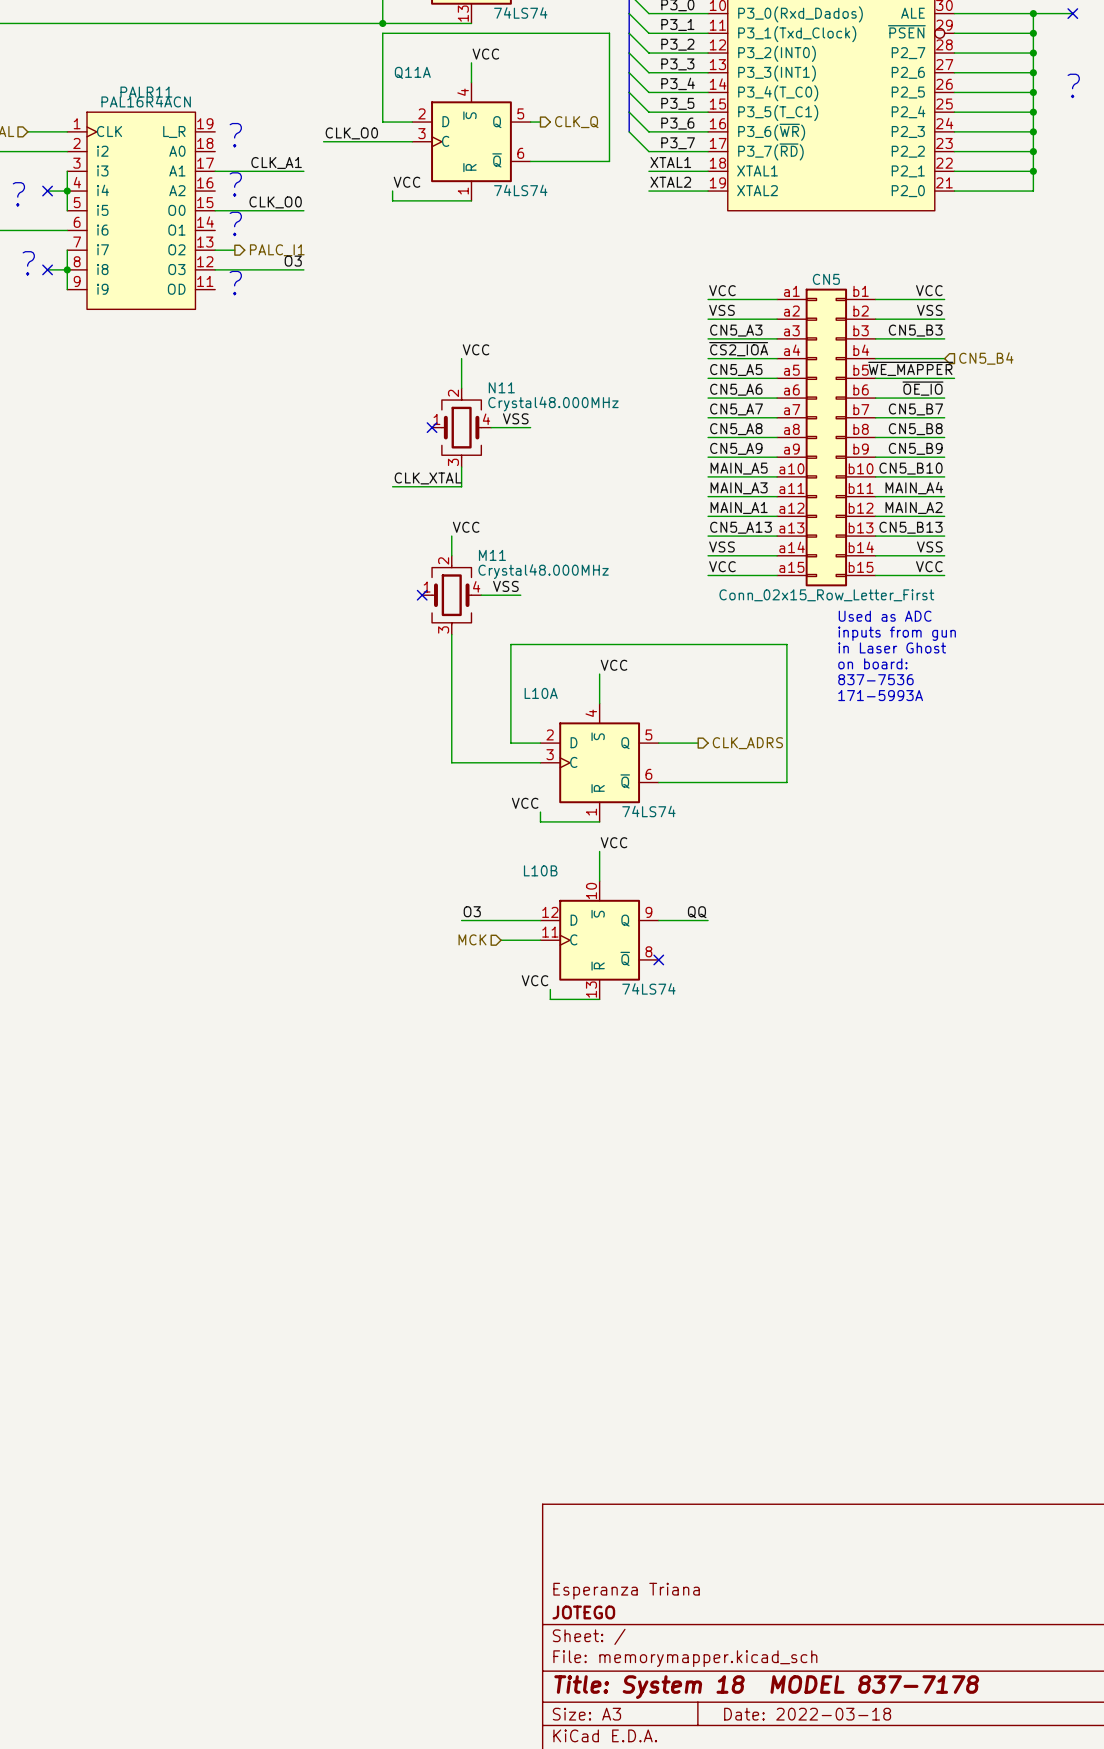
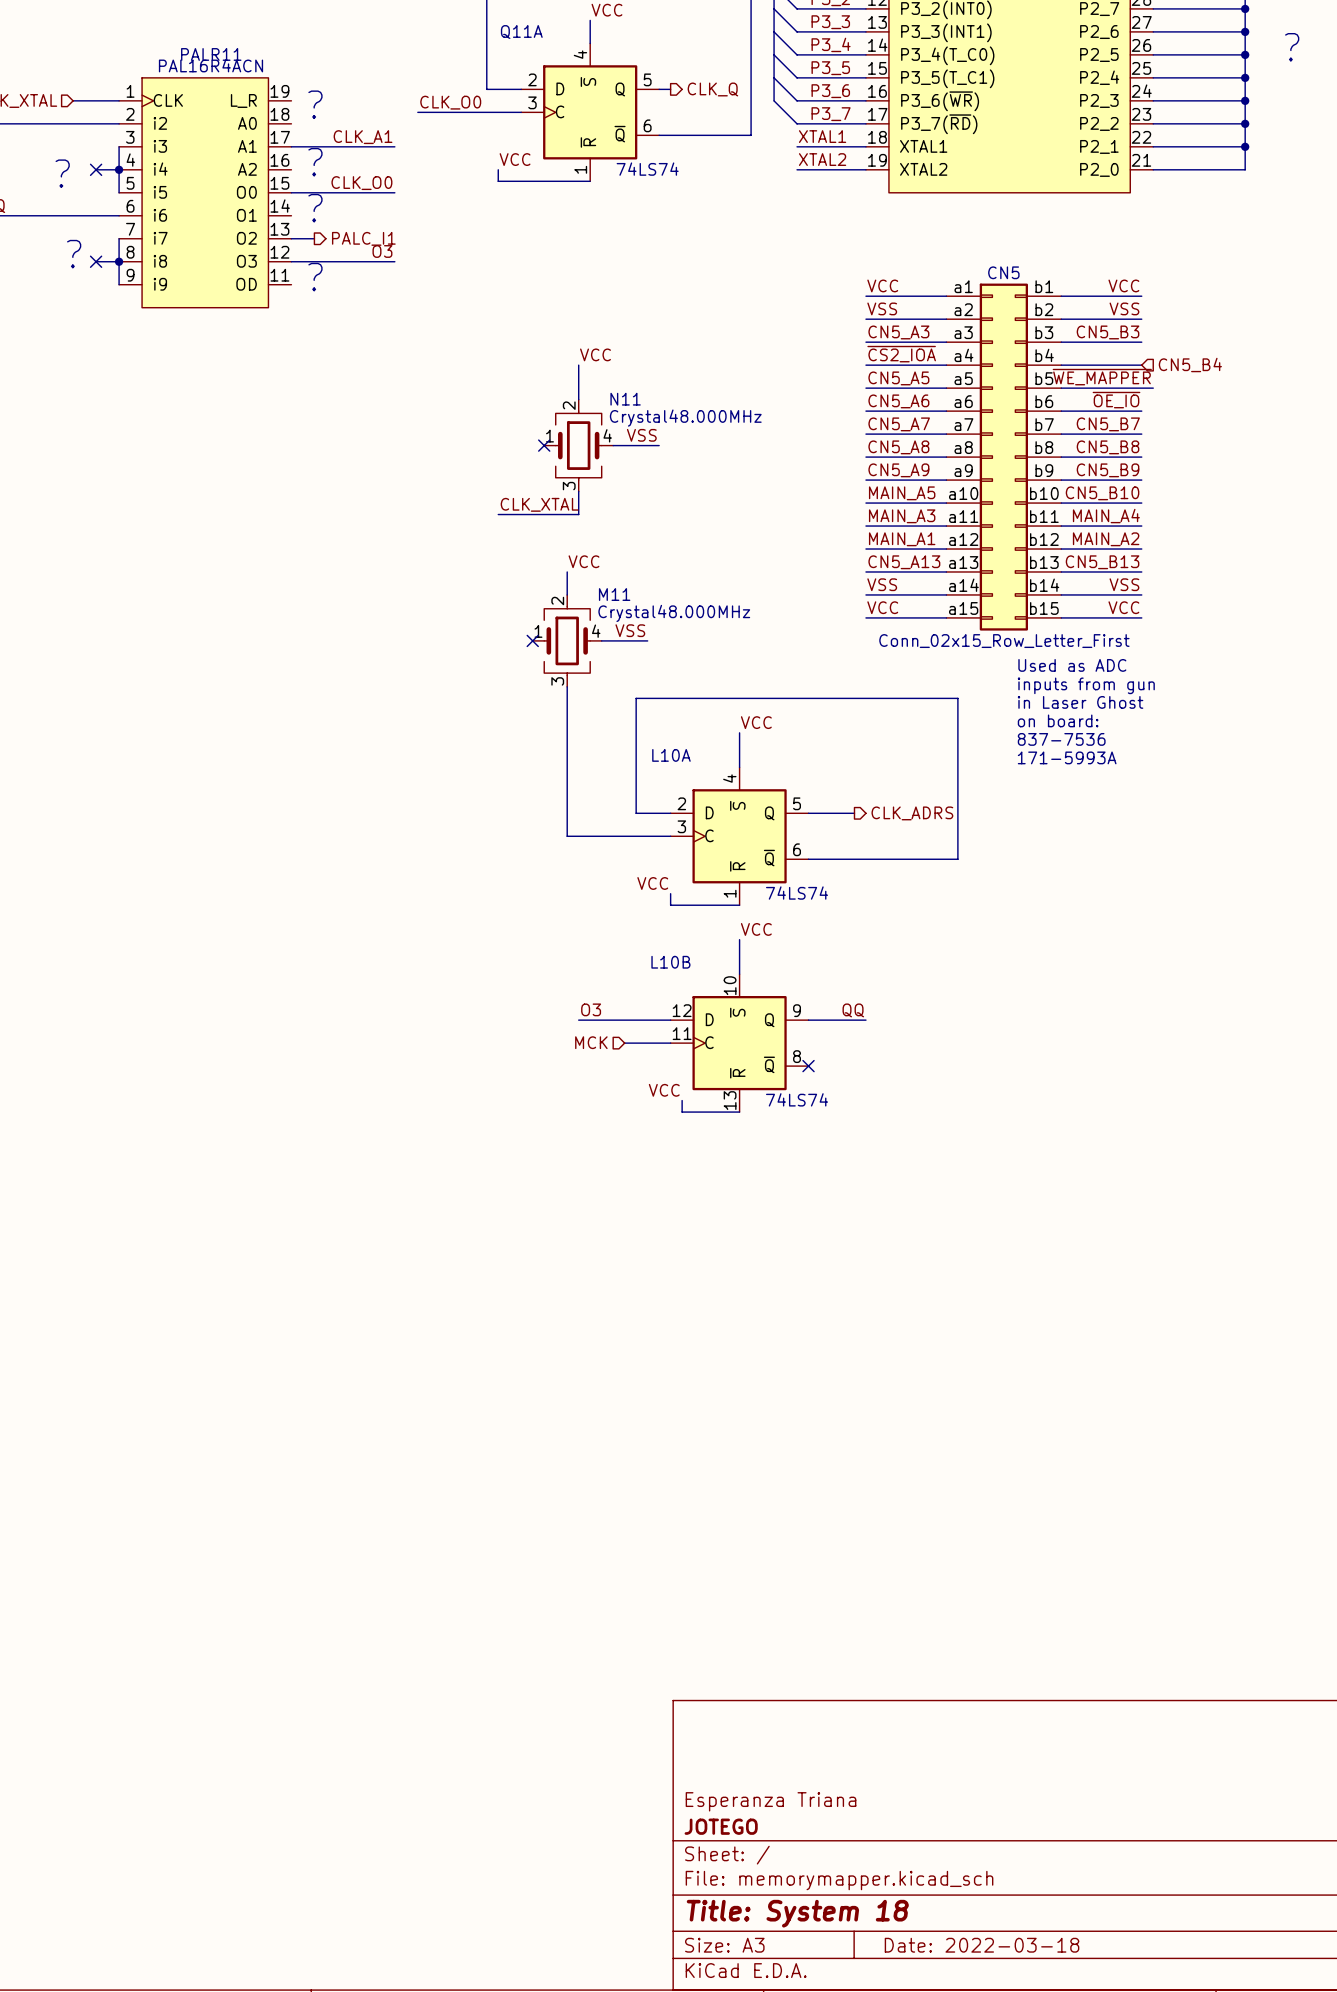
title block: Title: System 18 MODEL 837-7178 (766, 1687) -> Title: System 18 (797, 1913)

